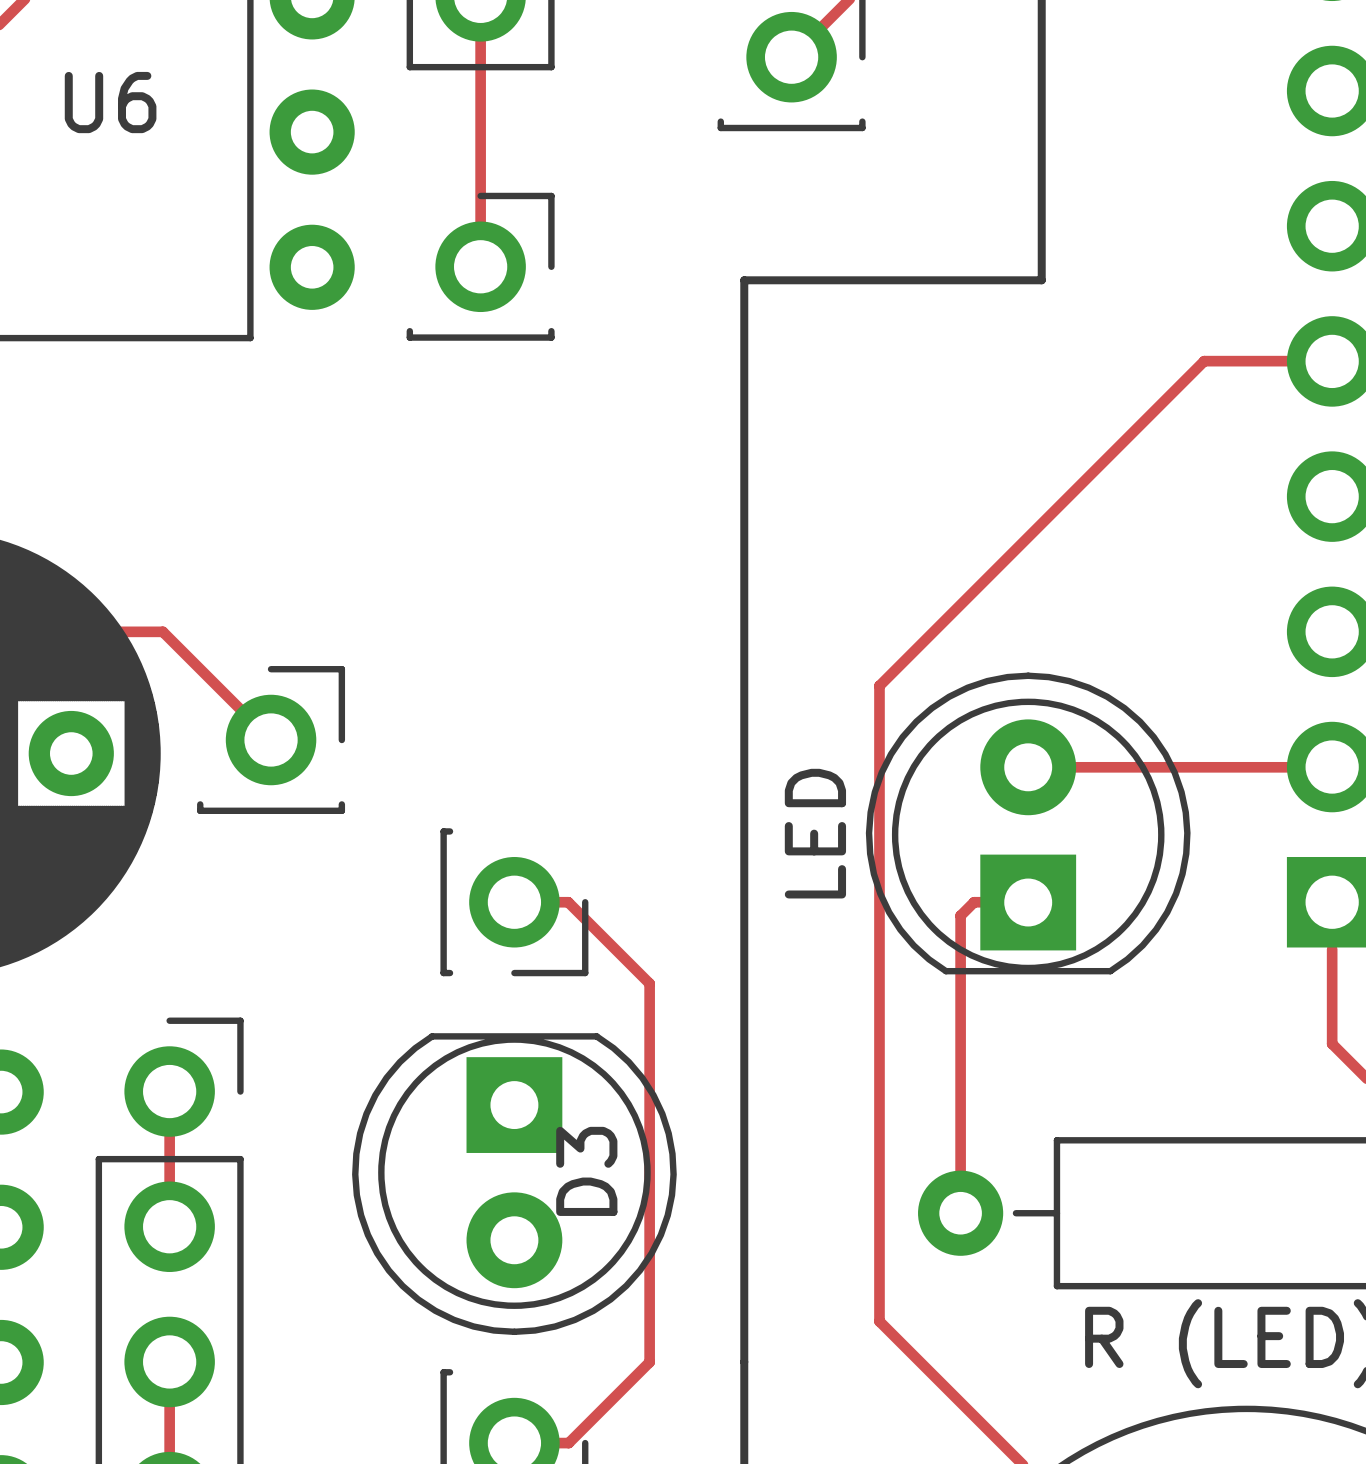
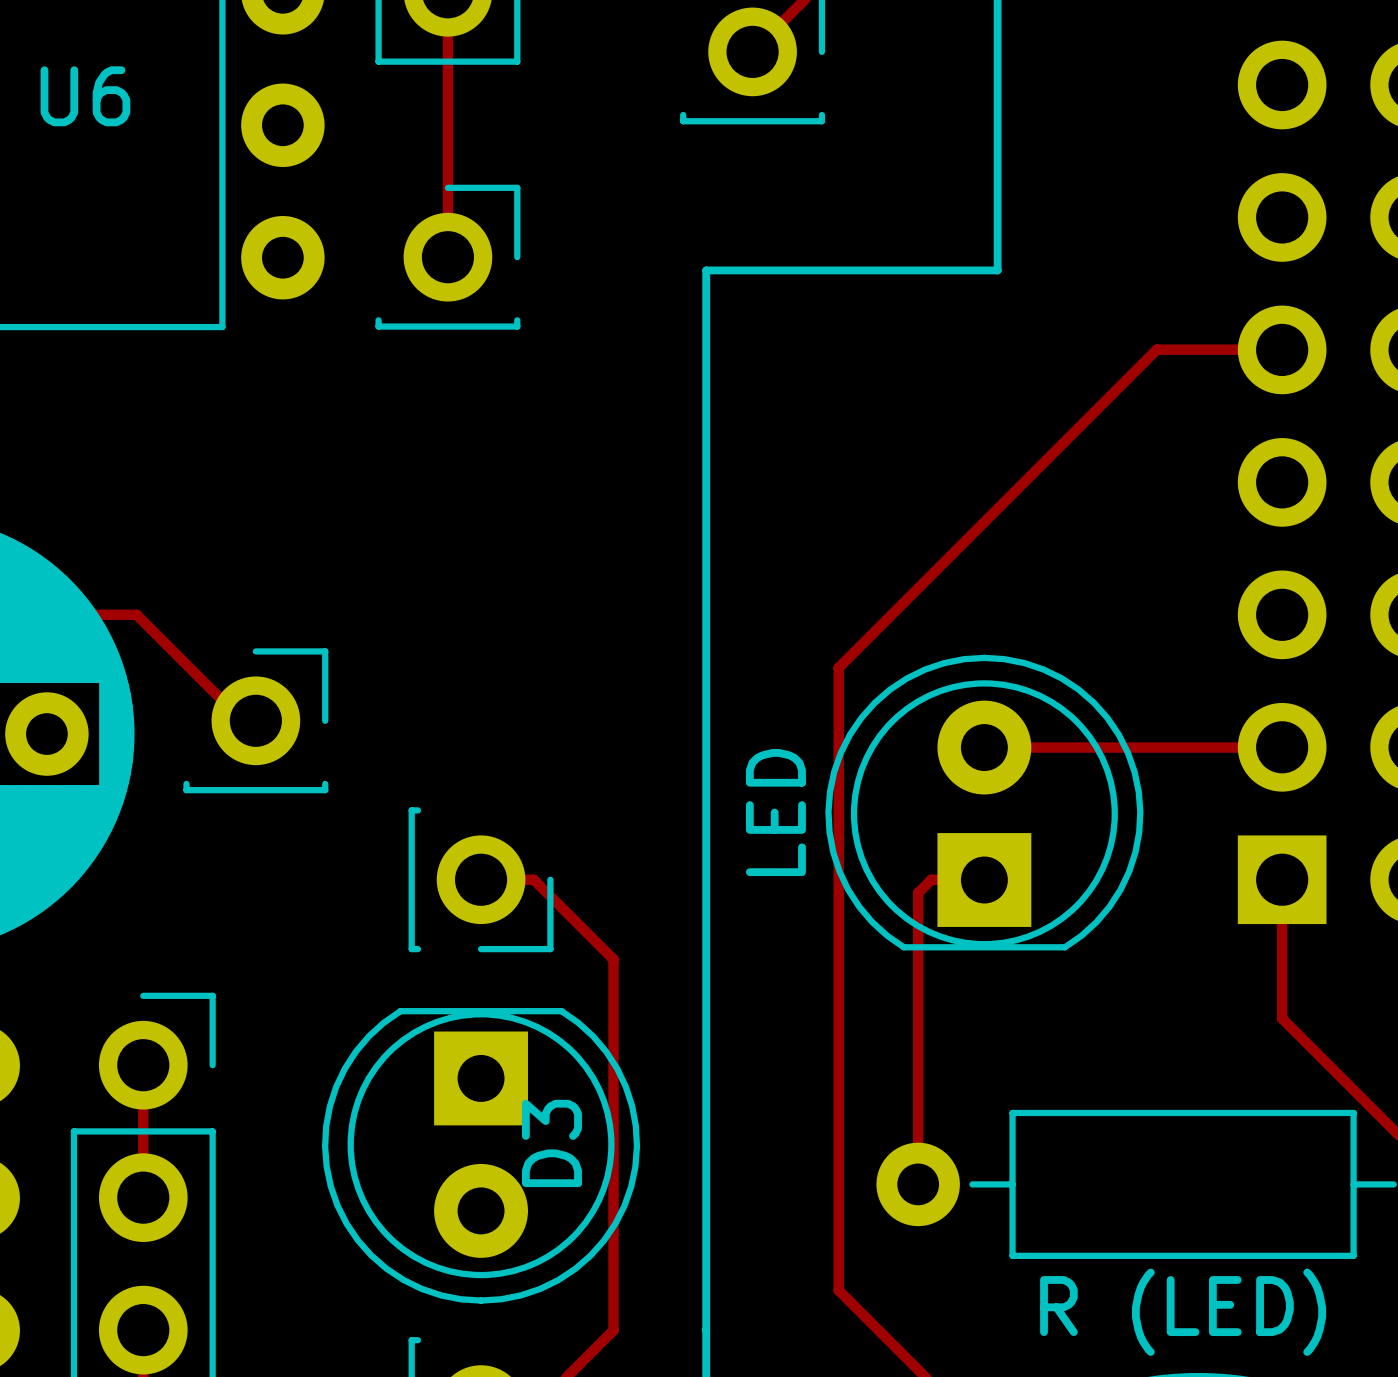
part position: (271, 740) -> (255, 720)

